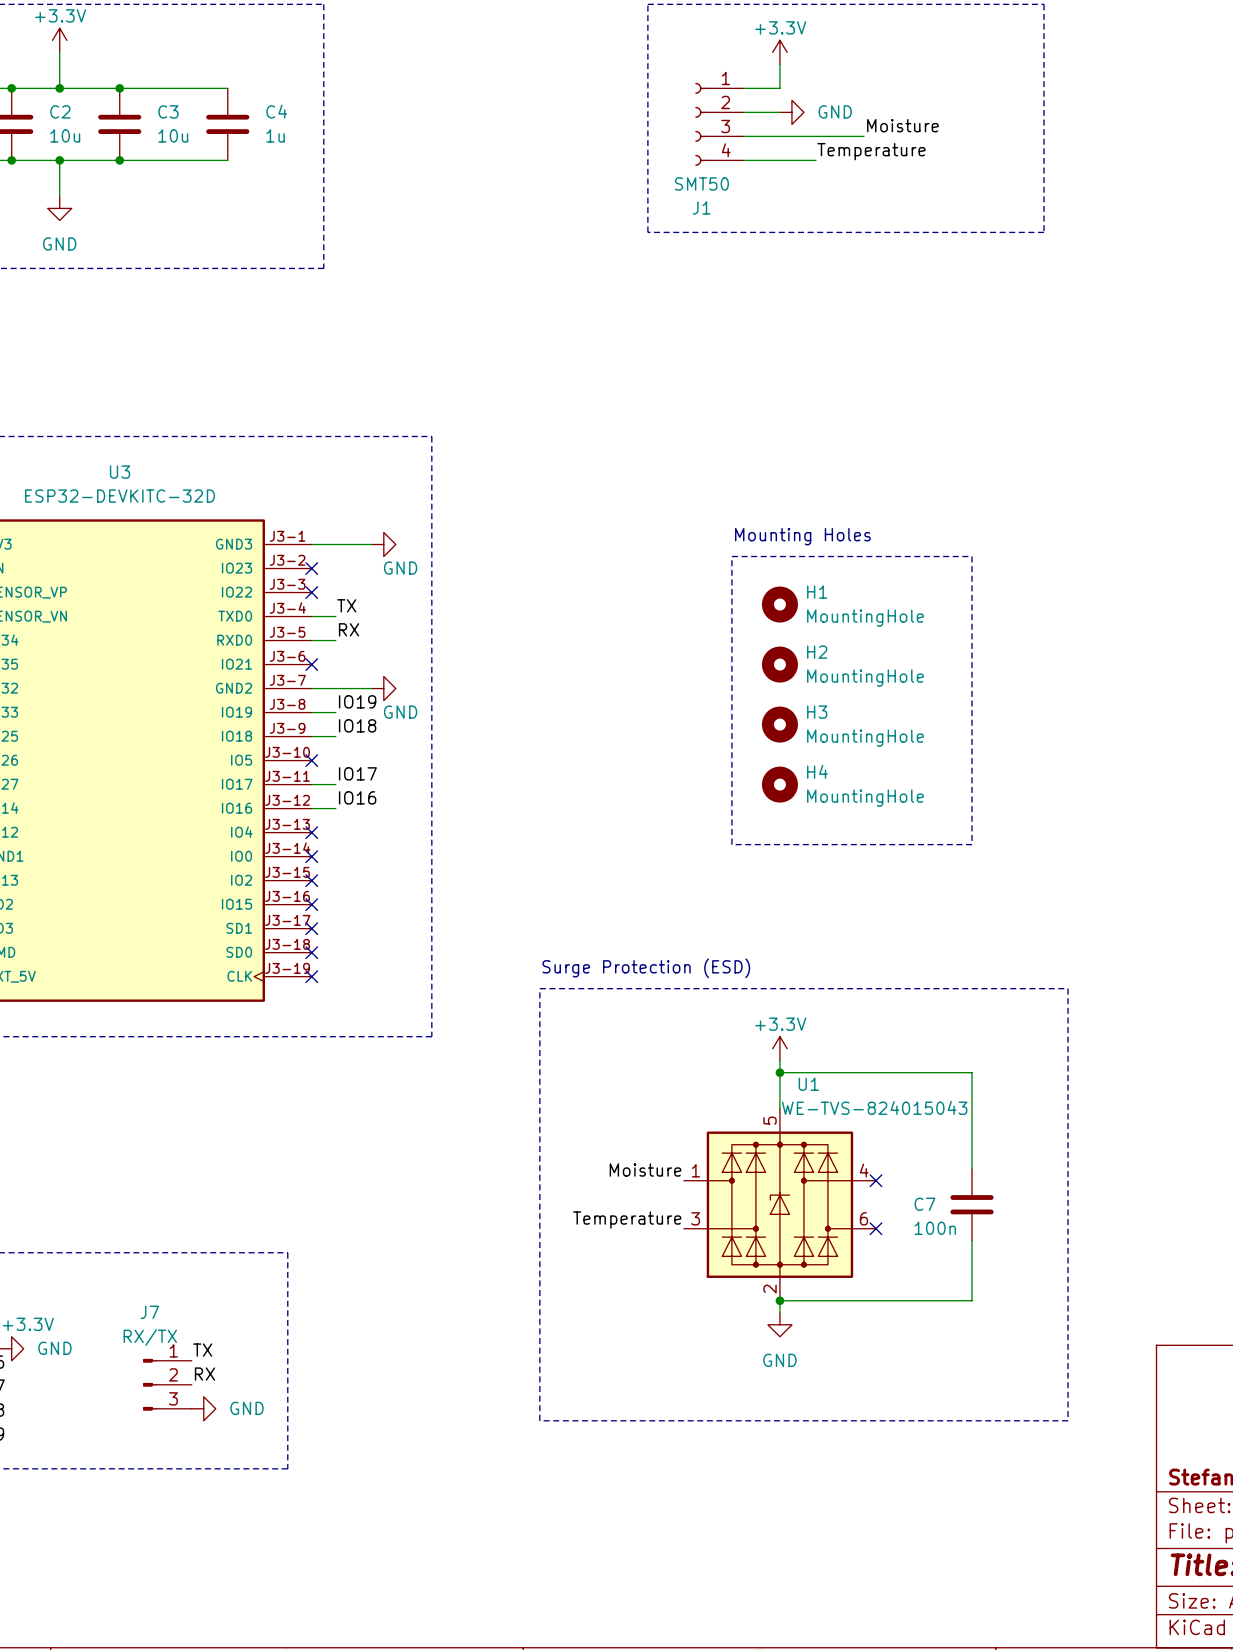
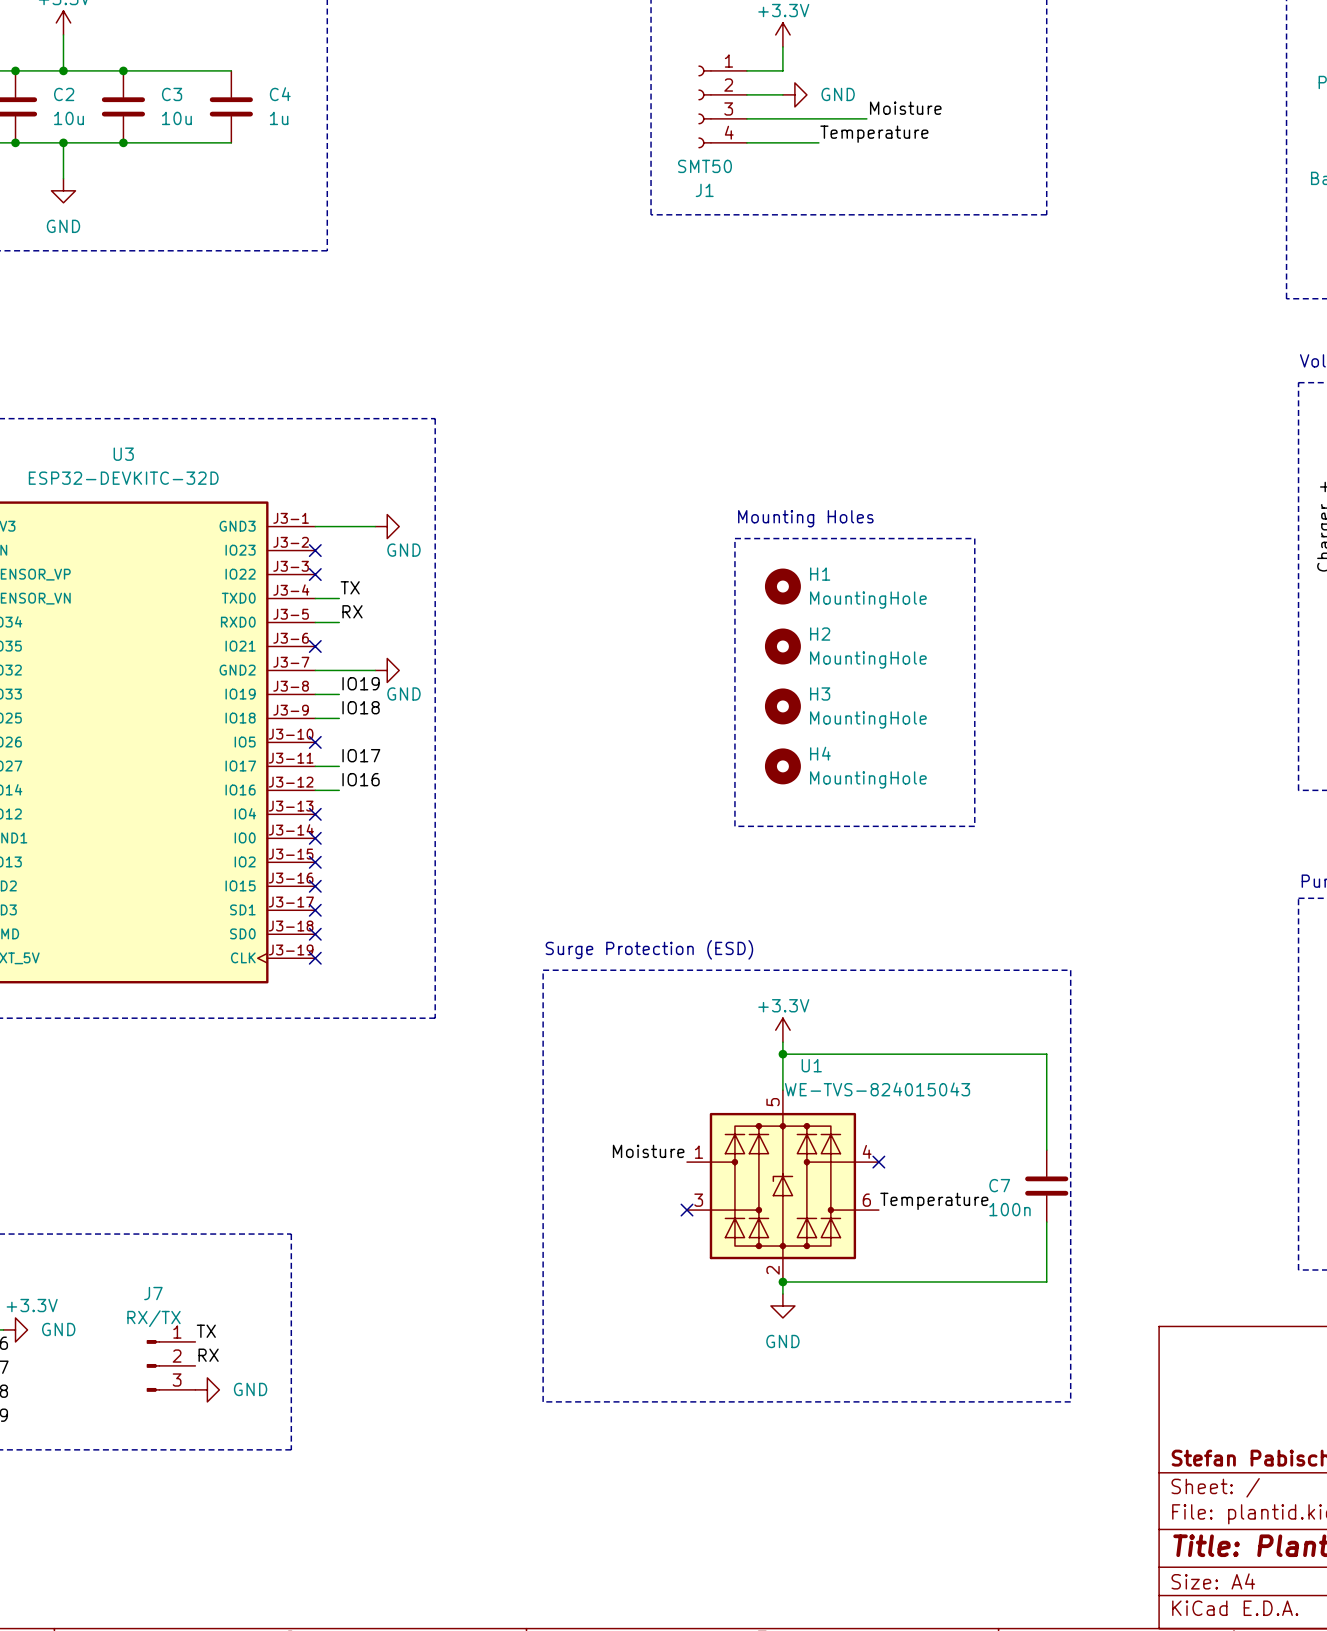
wire: (972, 1072) (972, 1168) -> (974, 1054) (1046, 1054) (1046, 1150)
C7 position: (972, 1204) -> (1046, 1186)
label position: Temperature (627, 1220) -> Temperature (934, 1201)
no-connect mark: none -> (687, 1210)
no-connect mark: (875, 1228) -> none
wire: (972, 1240) (972, 1300) -> (1046, 1222) (1046, 1281) (974, 1281)

